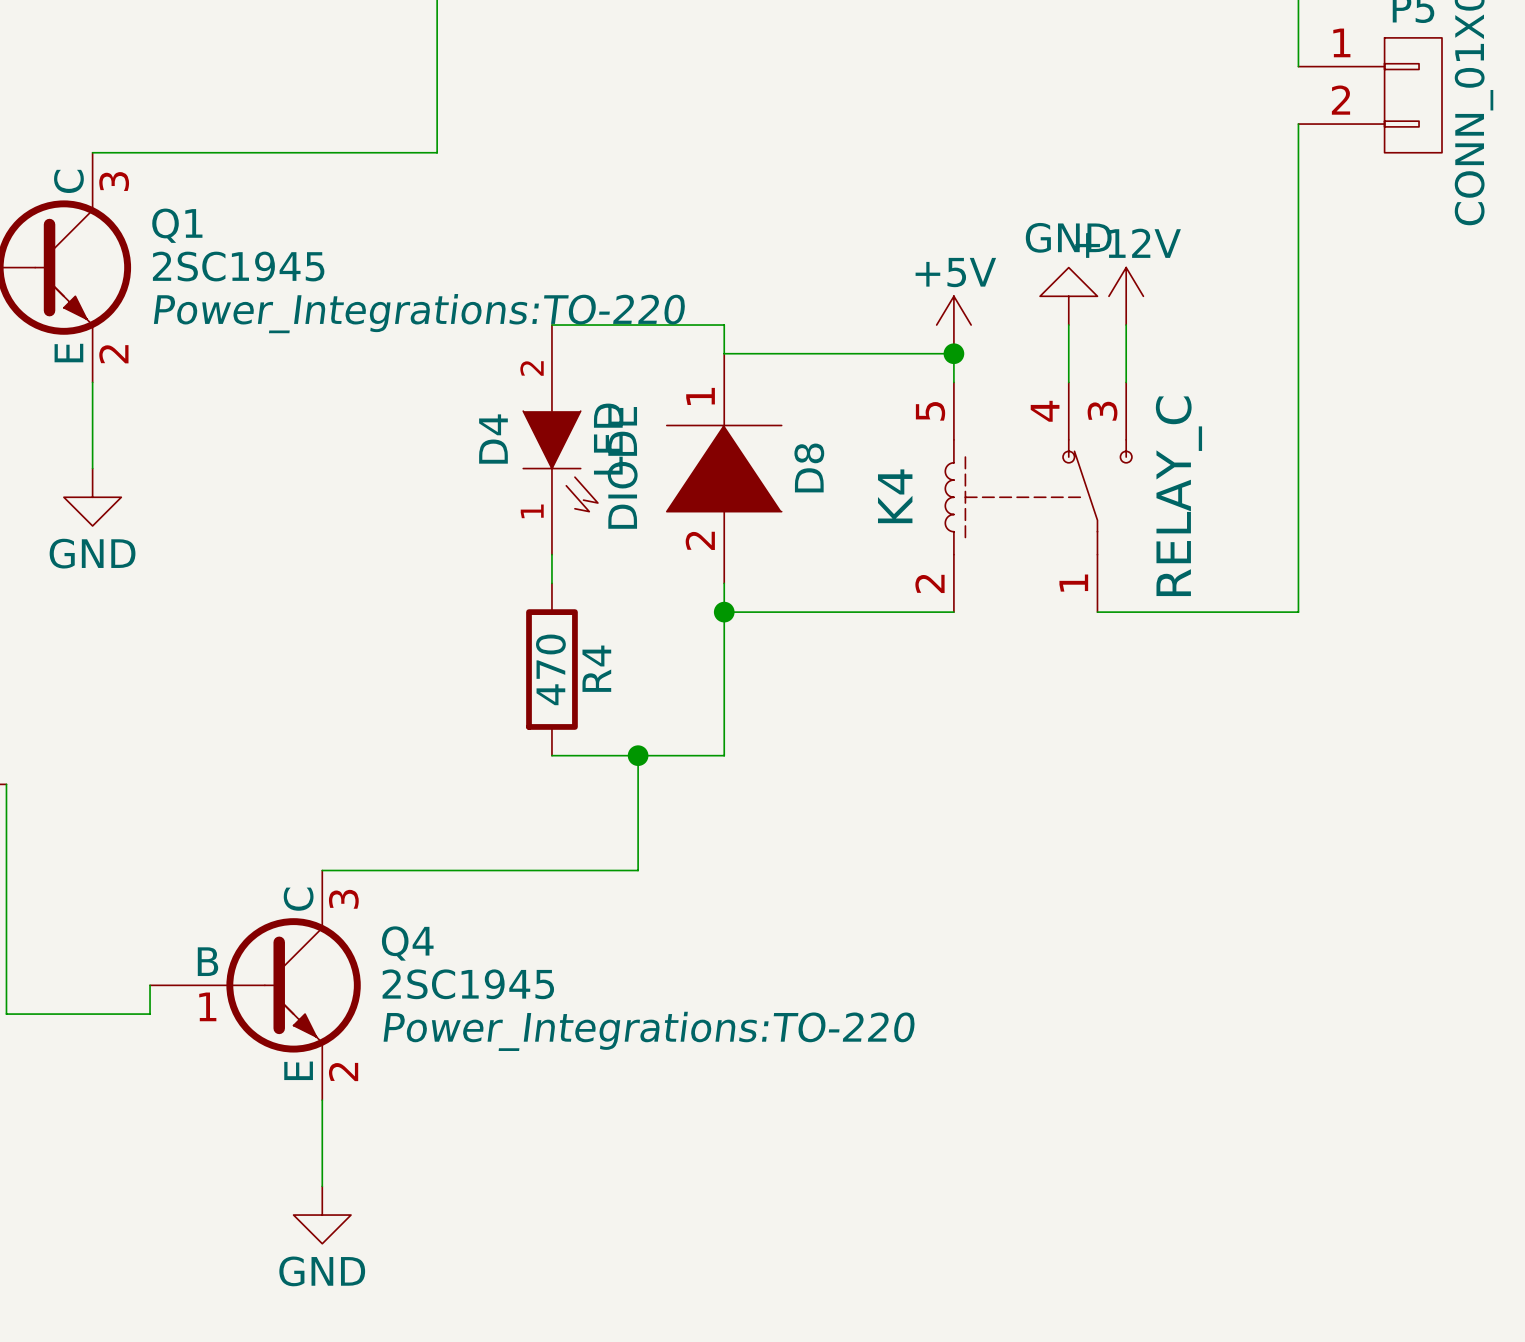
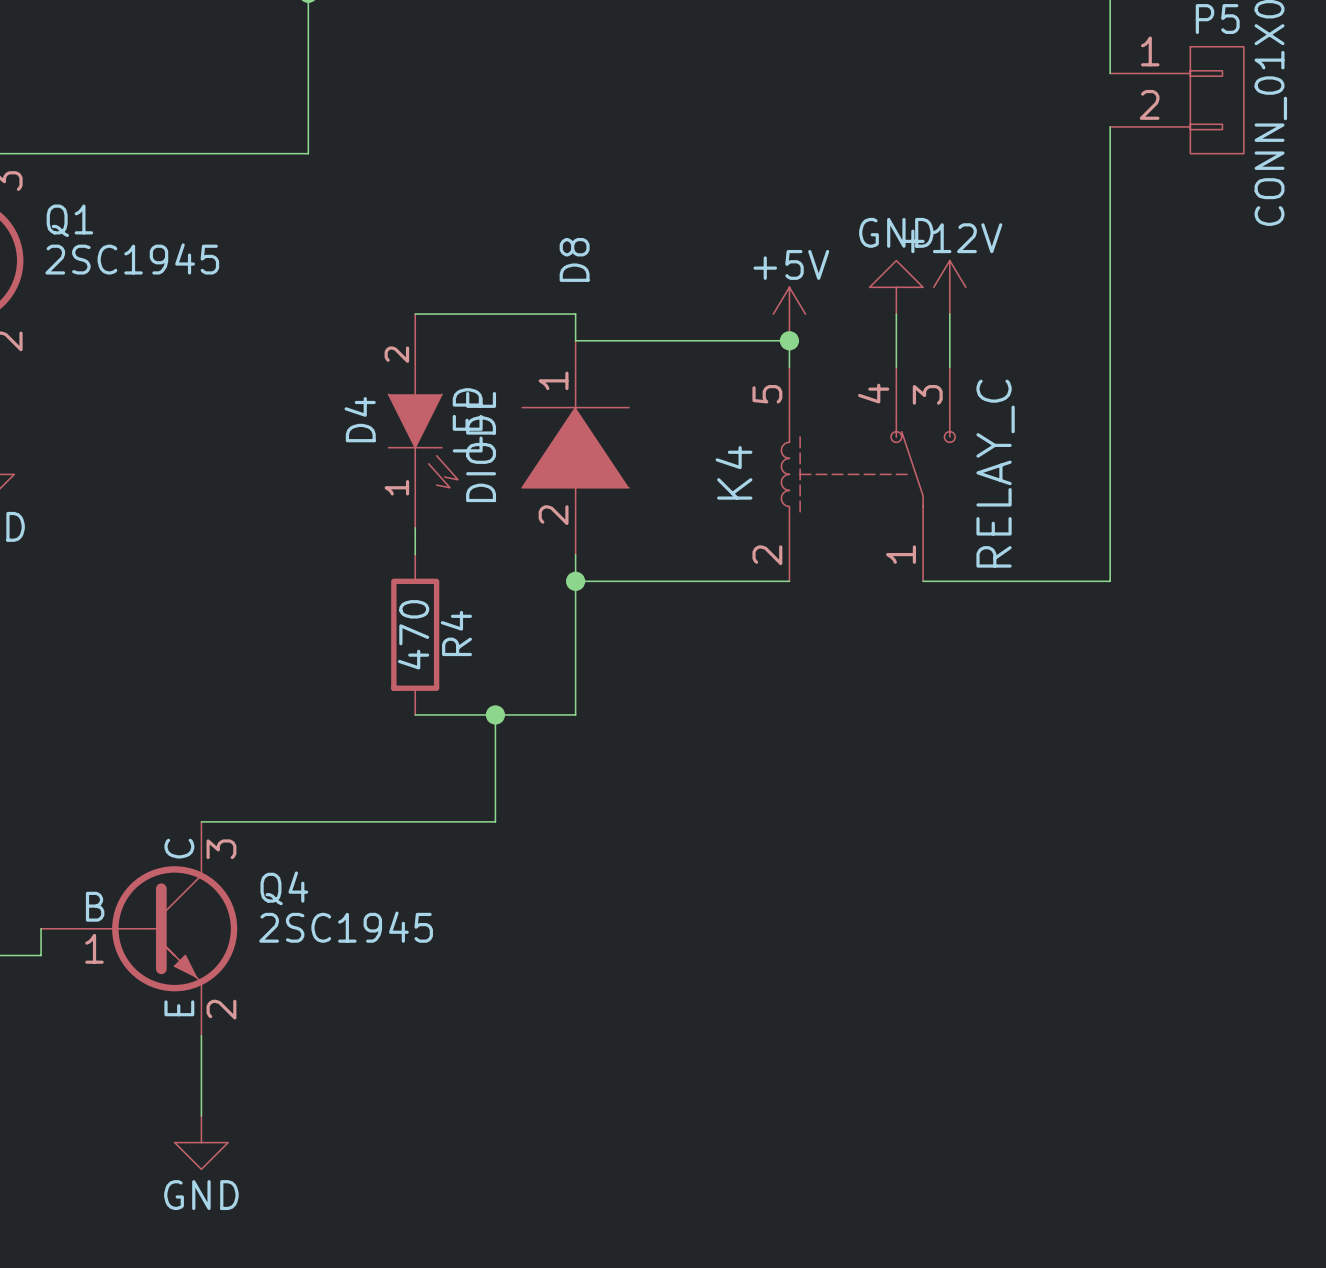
Q1 text: Power_Integrations:TO-220 (419, 313) -> none
D8 name position: D8 (809, 467) -> D8 (574, 259)
Q4 text: Power_Integrations:TO-220 (649, 1031) -> none

